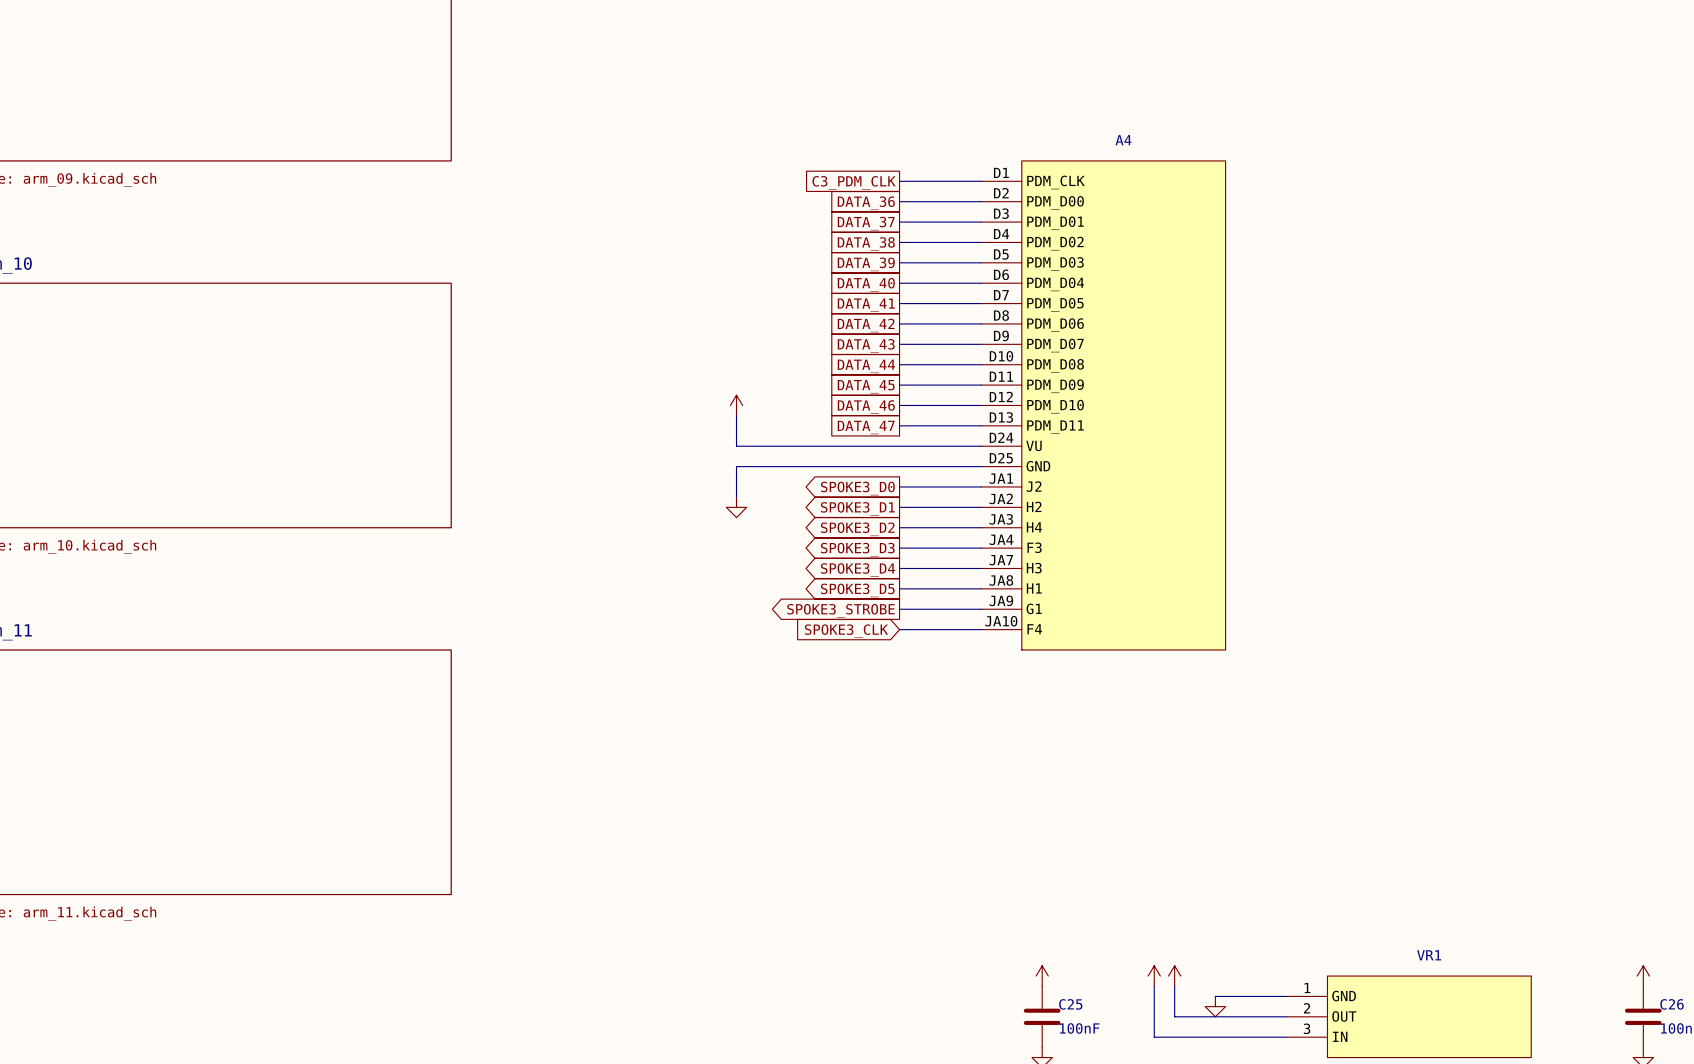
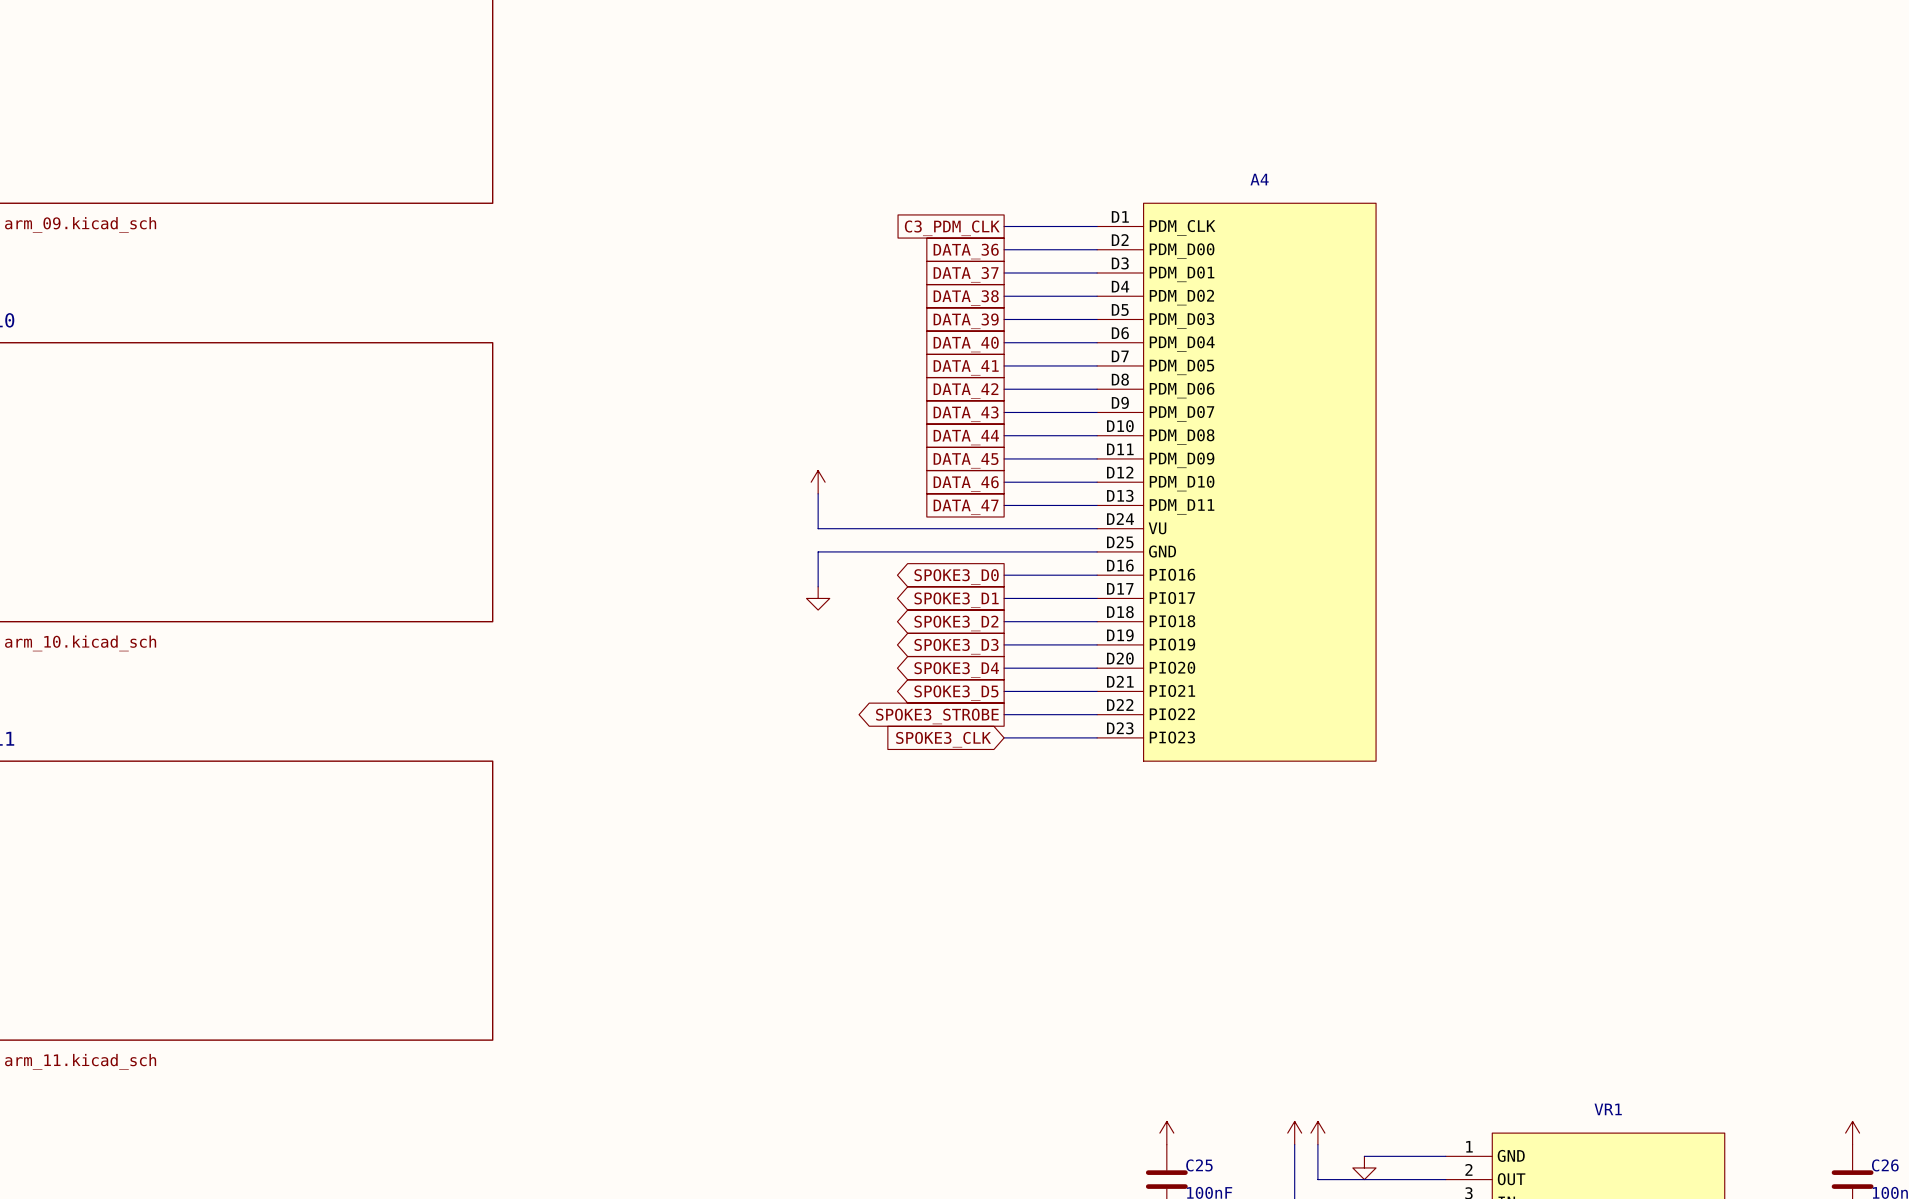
A4 symbol: [981, 160, 1226, 651] -> [1097, 203, 1377, 762]

